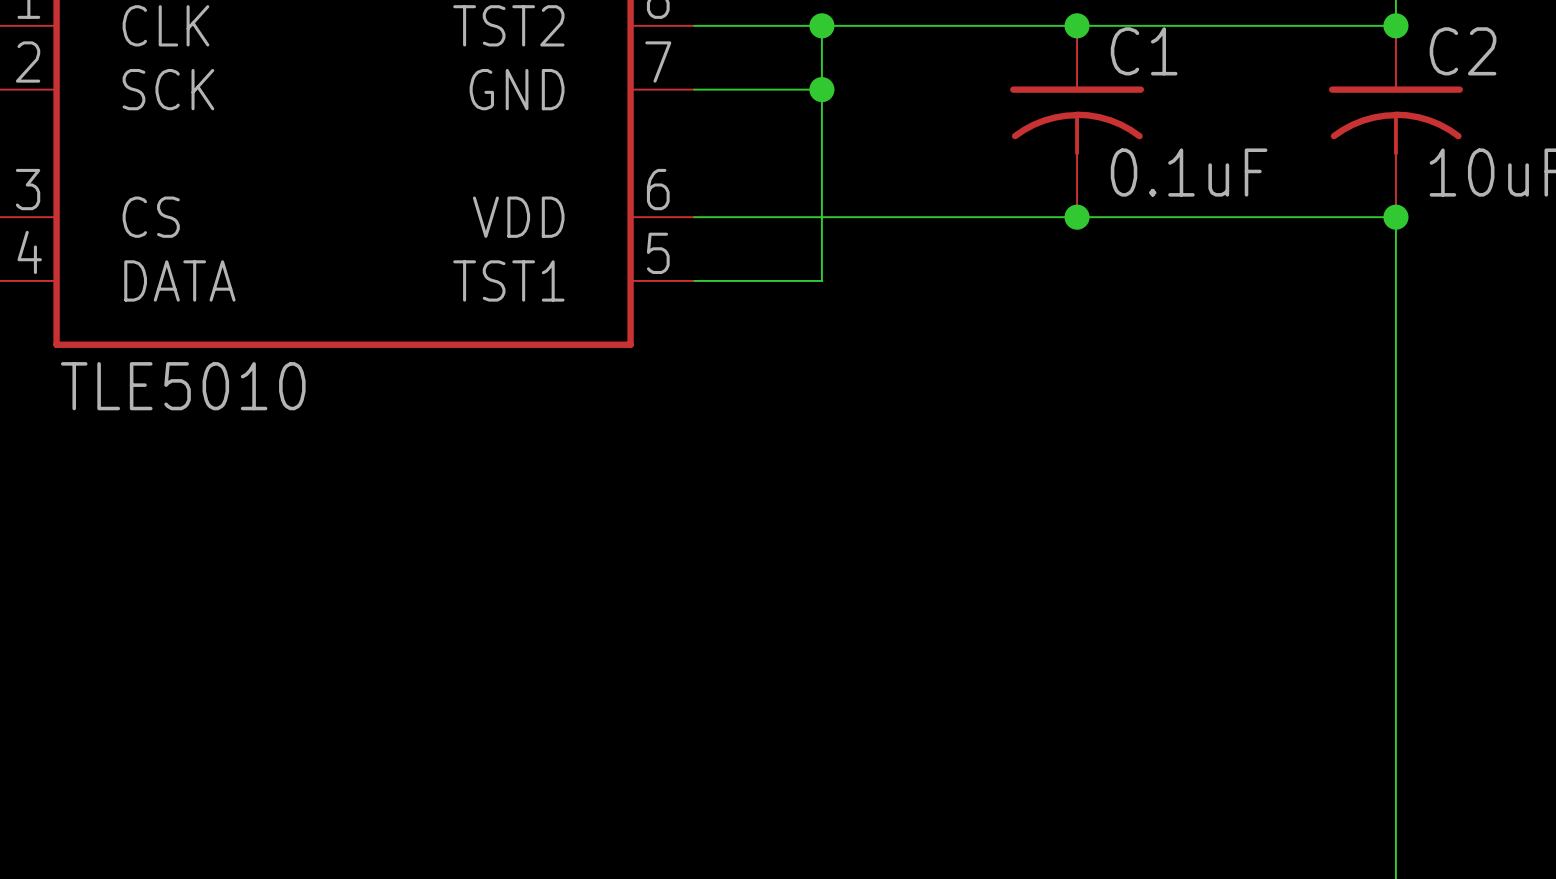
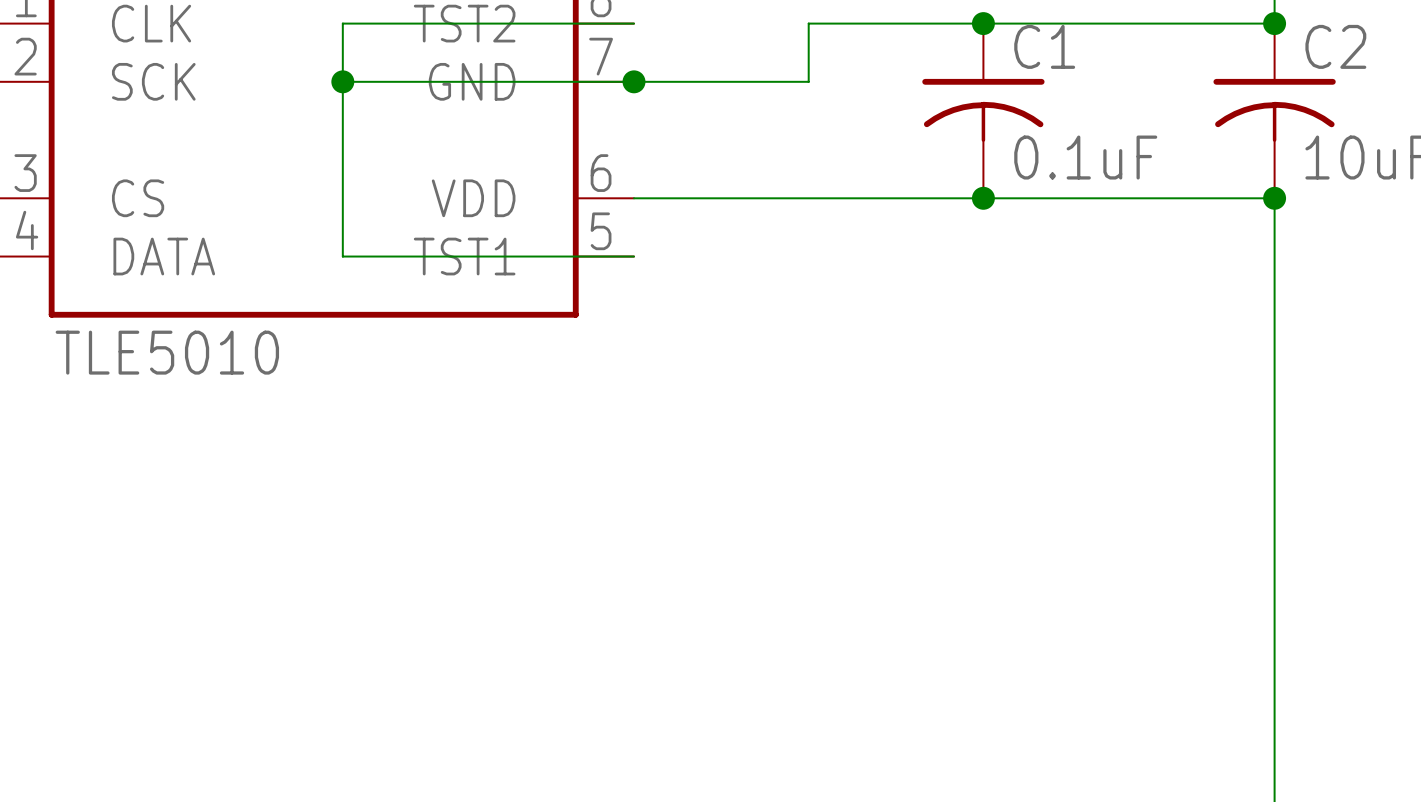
wire: (694, 25) (885, 25) -> (750, 81) (808, 81) (808, 23)
wire: (821, 25) (821, 280) (694, 280) -> (634, 23) (342, 23) (342, 256) (634, 256)
junction: (821, 25) -> none
wire: none -> (342, 81) (634, 81)
junction: none -> (342, 81)
junction: none -> (634, 81)
junction: (821, 89) -> none

